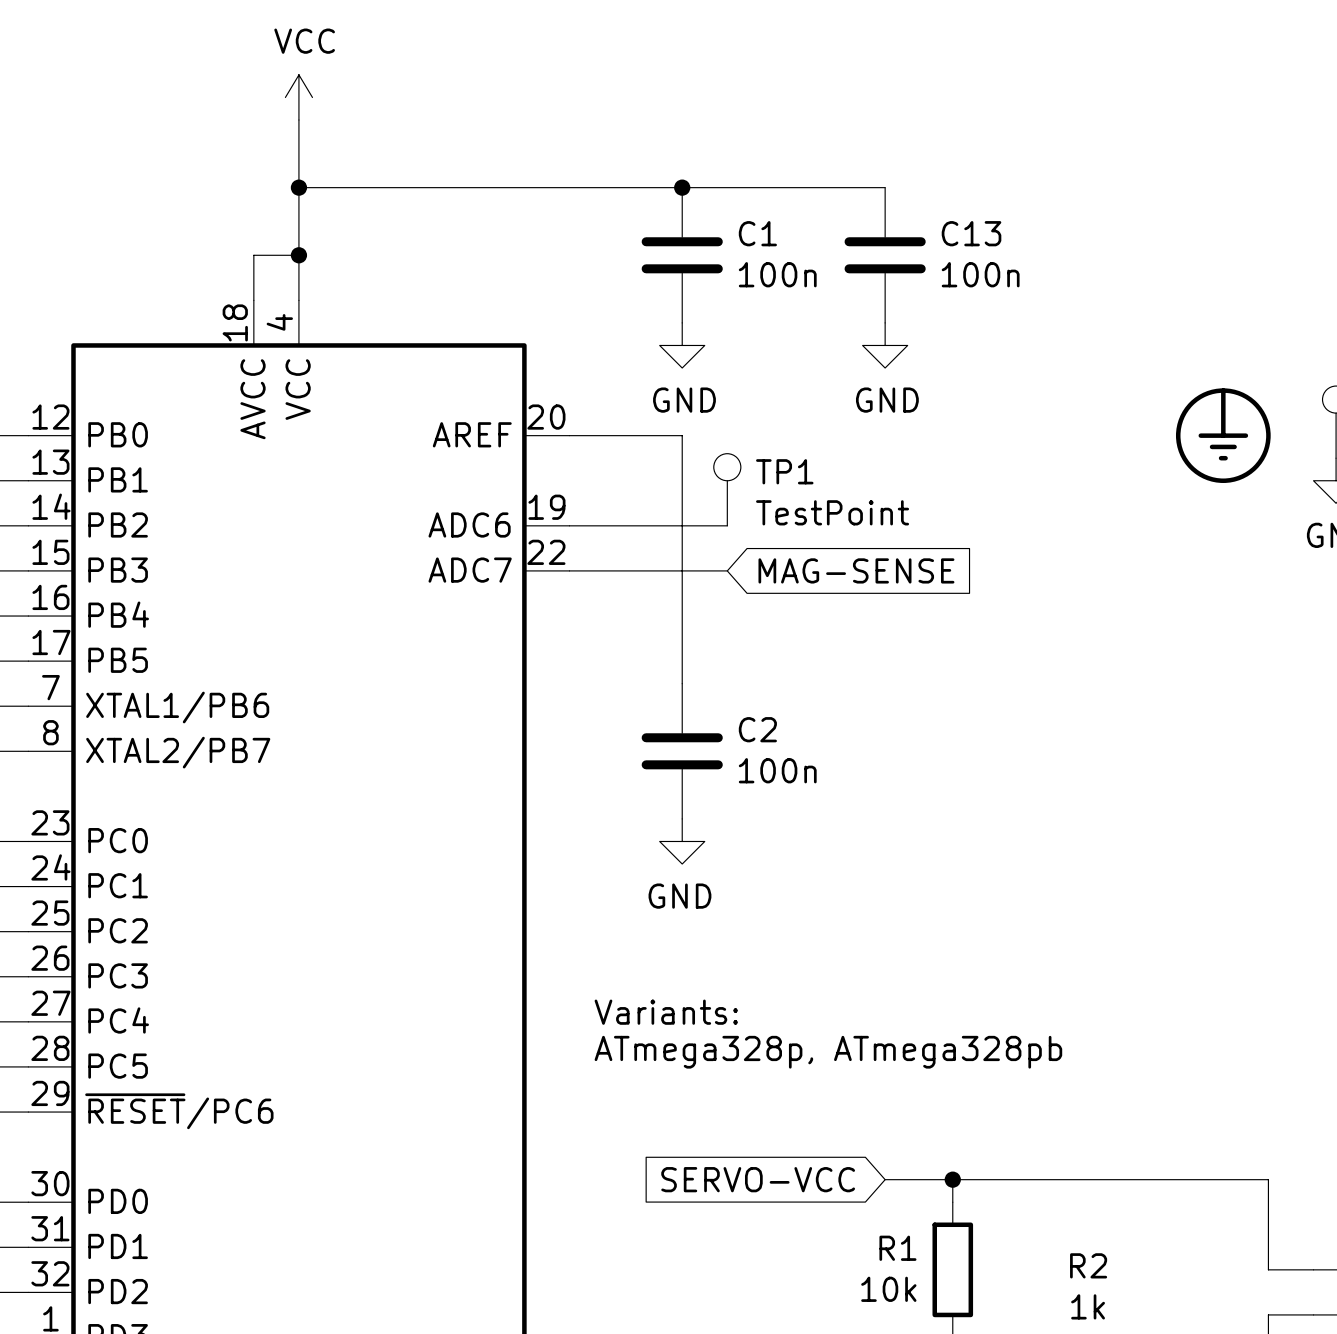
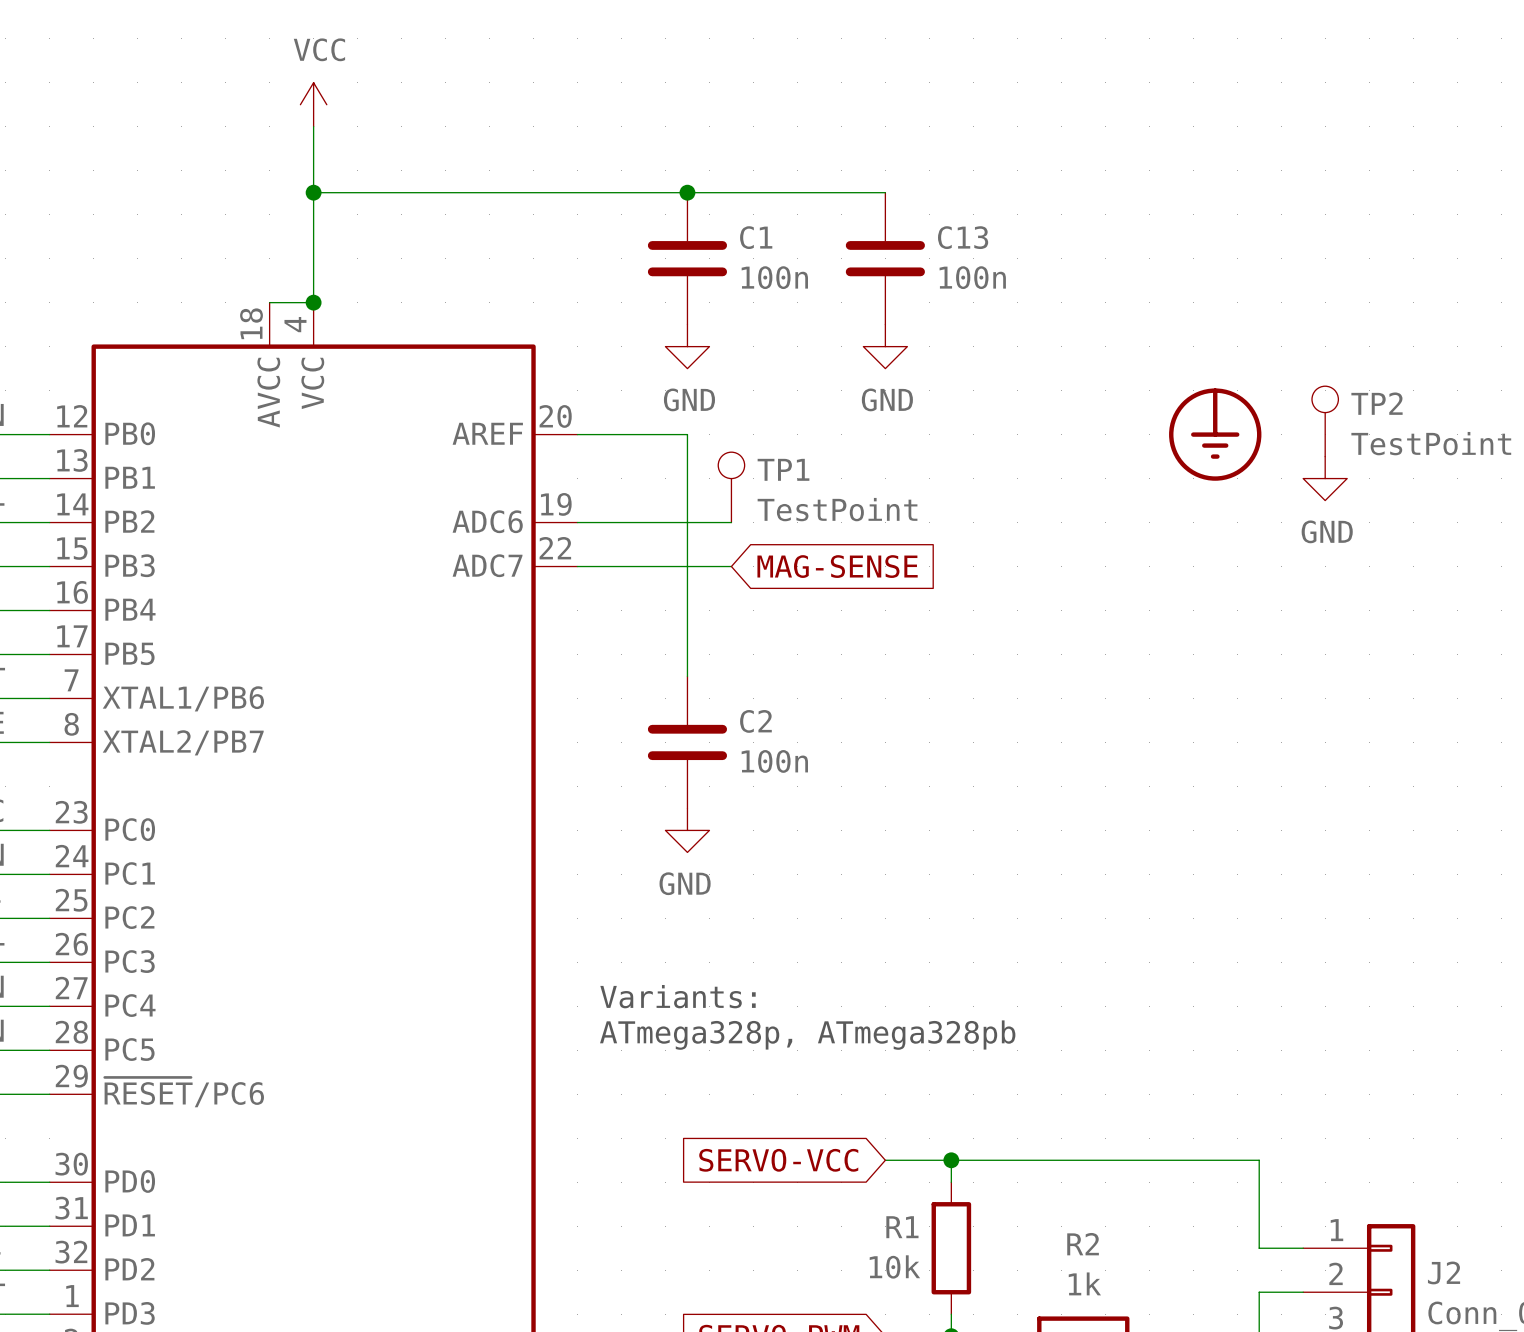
wire: (298, 255) (253, 255) (253, 300) -> (313, 302) (269, 302)
junction position: (298, 255) -> (313, 302)

